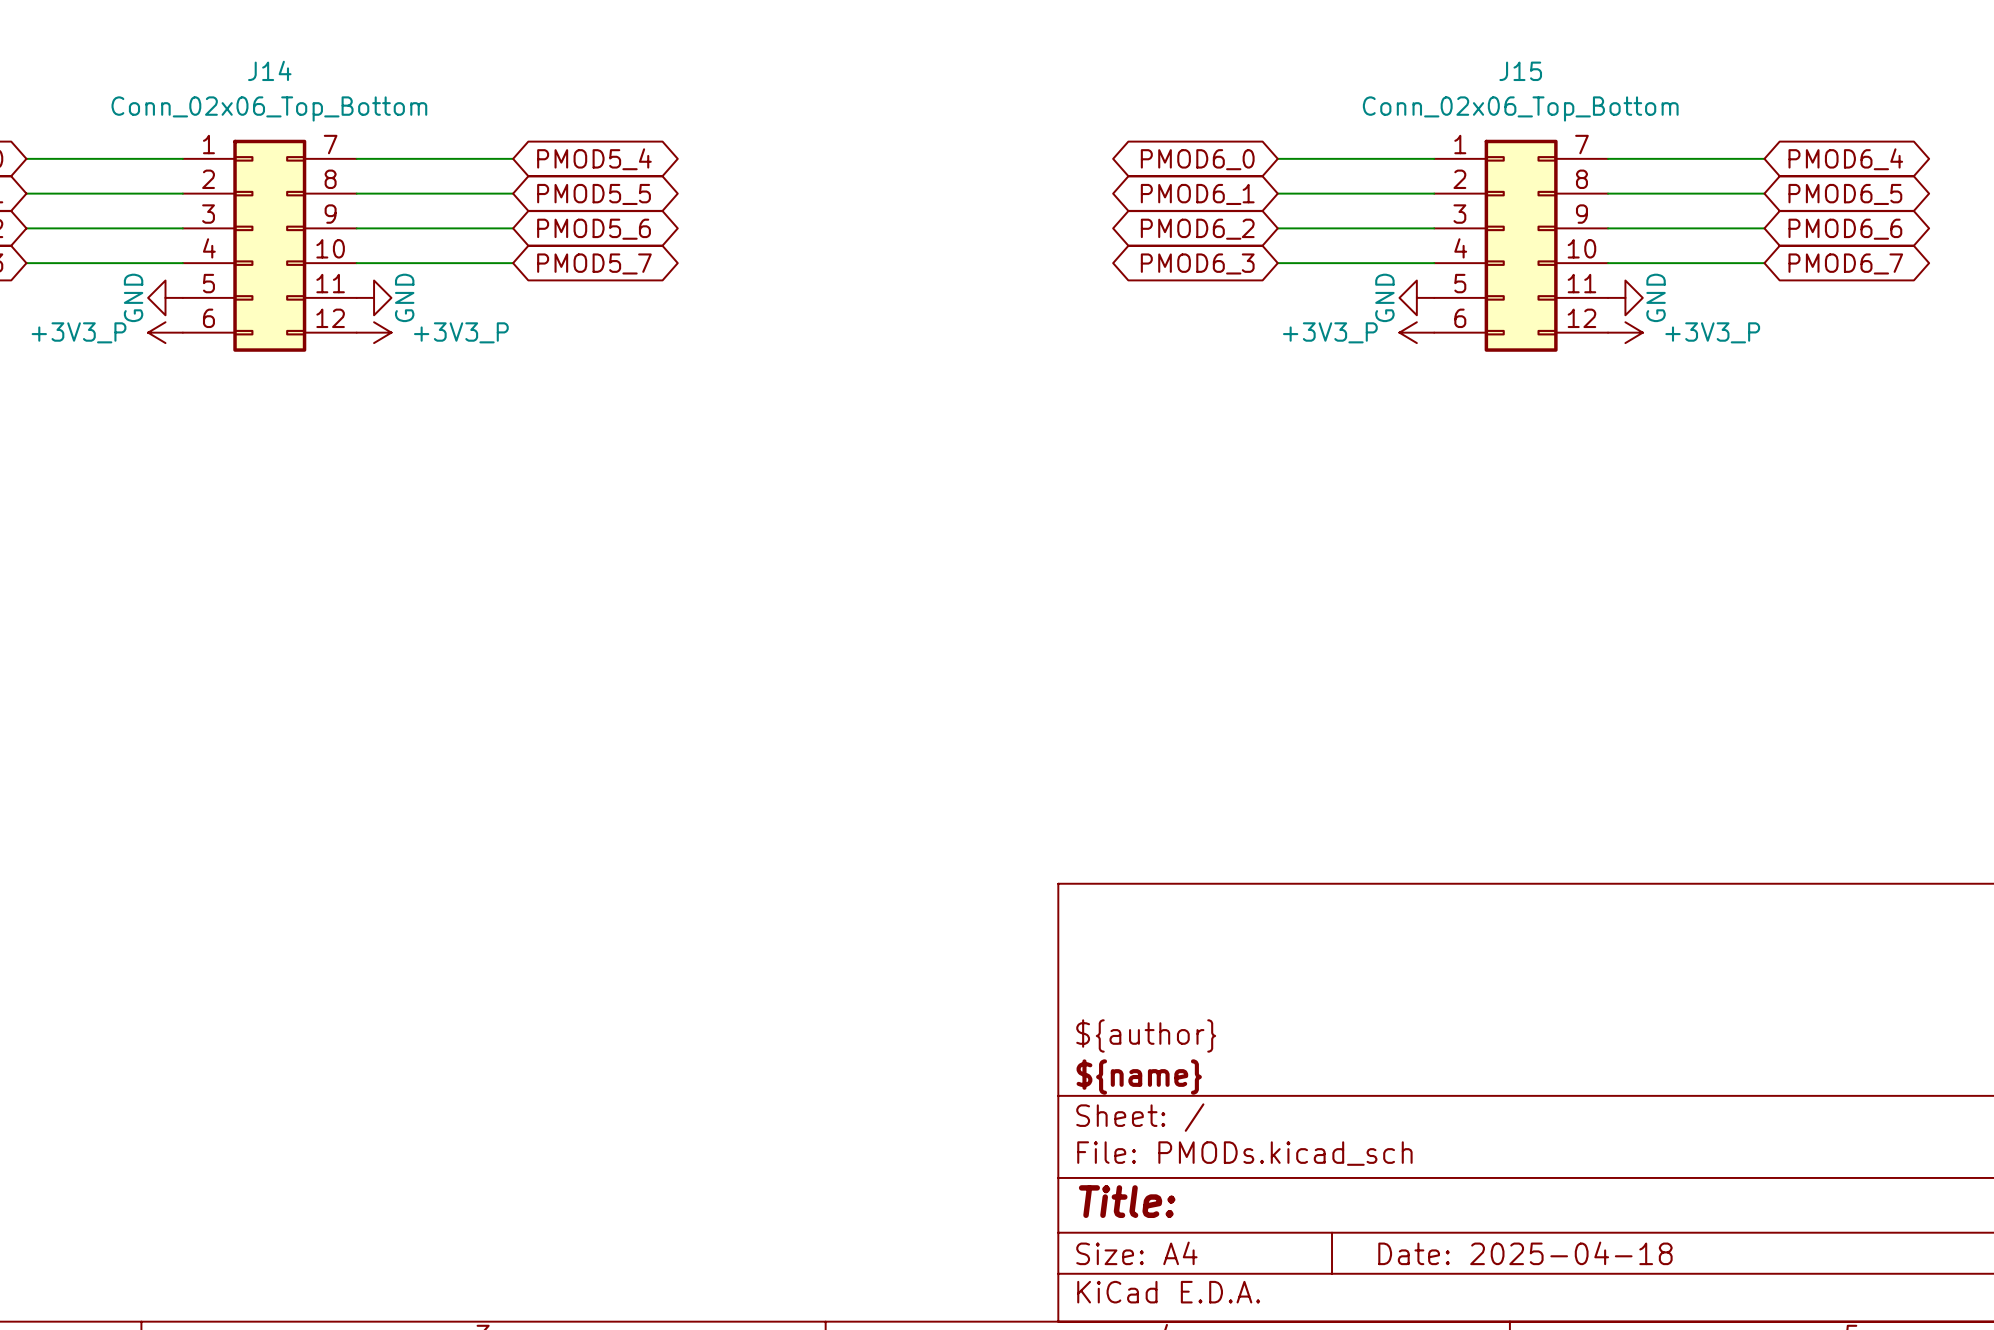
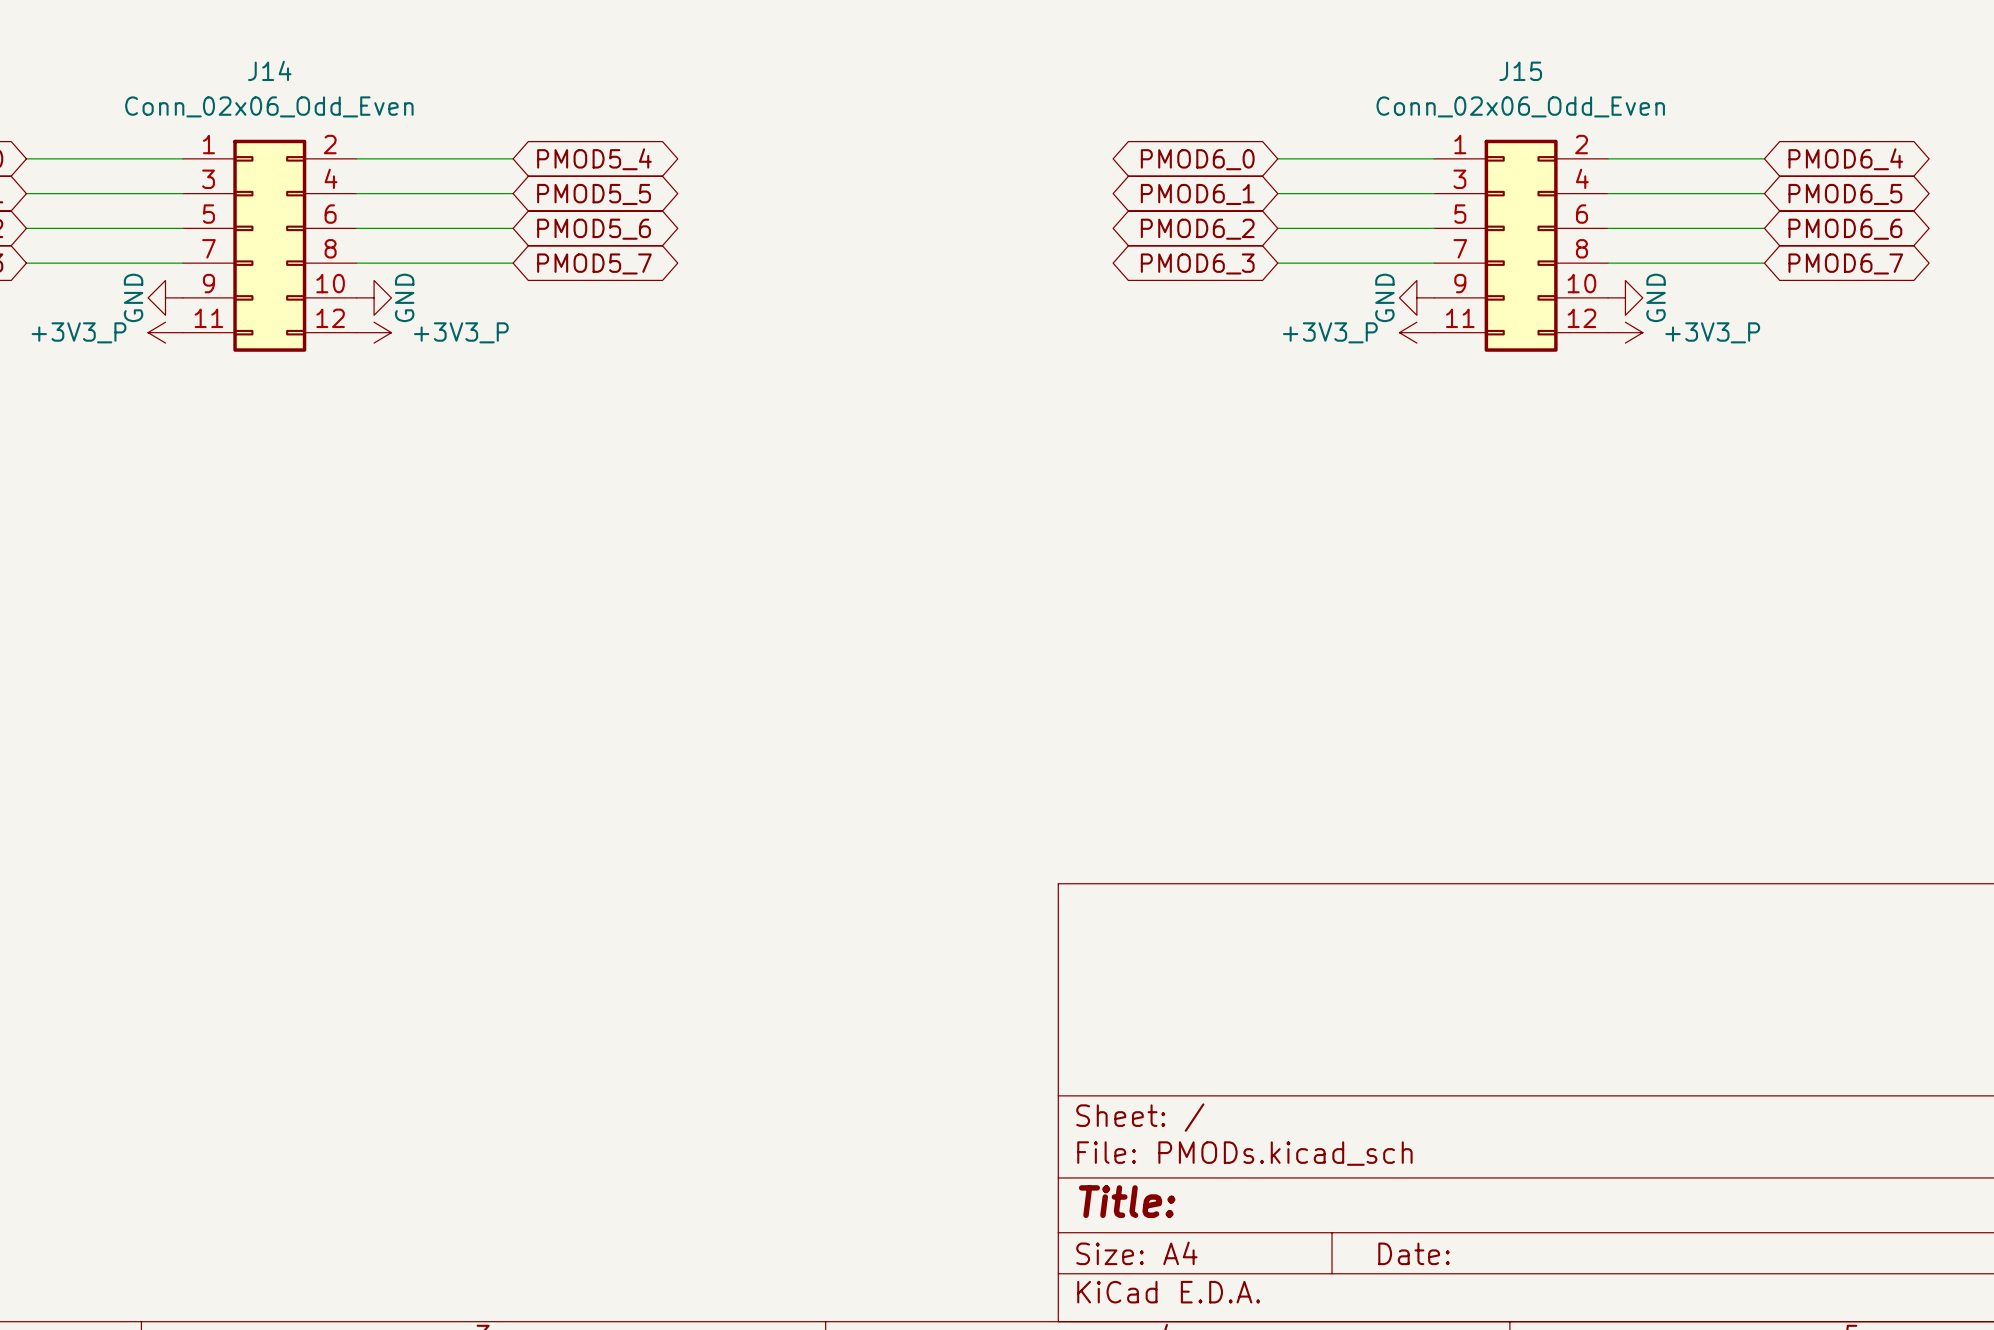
J14 value: Conn_02x06_Top_Bottom (269, 108) -> Conn_02x06_Odd_Even (269, 106)
J15 value: Conn_02x06_Top_Bottom (1520, 108) -> Conn_02x06_Odd_Even (1520, 106)
J14 symbol: [182, 139, 357, 352] -> [182, 139, 357, 352]
J15 symbol: [1434, 139, 1609, 352] -> [1434, 139, 1609, 352]
title block: ${author} (1146, 1035) -> none
title block: ${name} (1139, 1077) -> none
title block: Date: 2025-04-18 (1525, 1253) -> Date: (1414, 1253)

